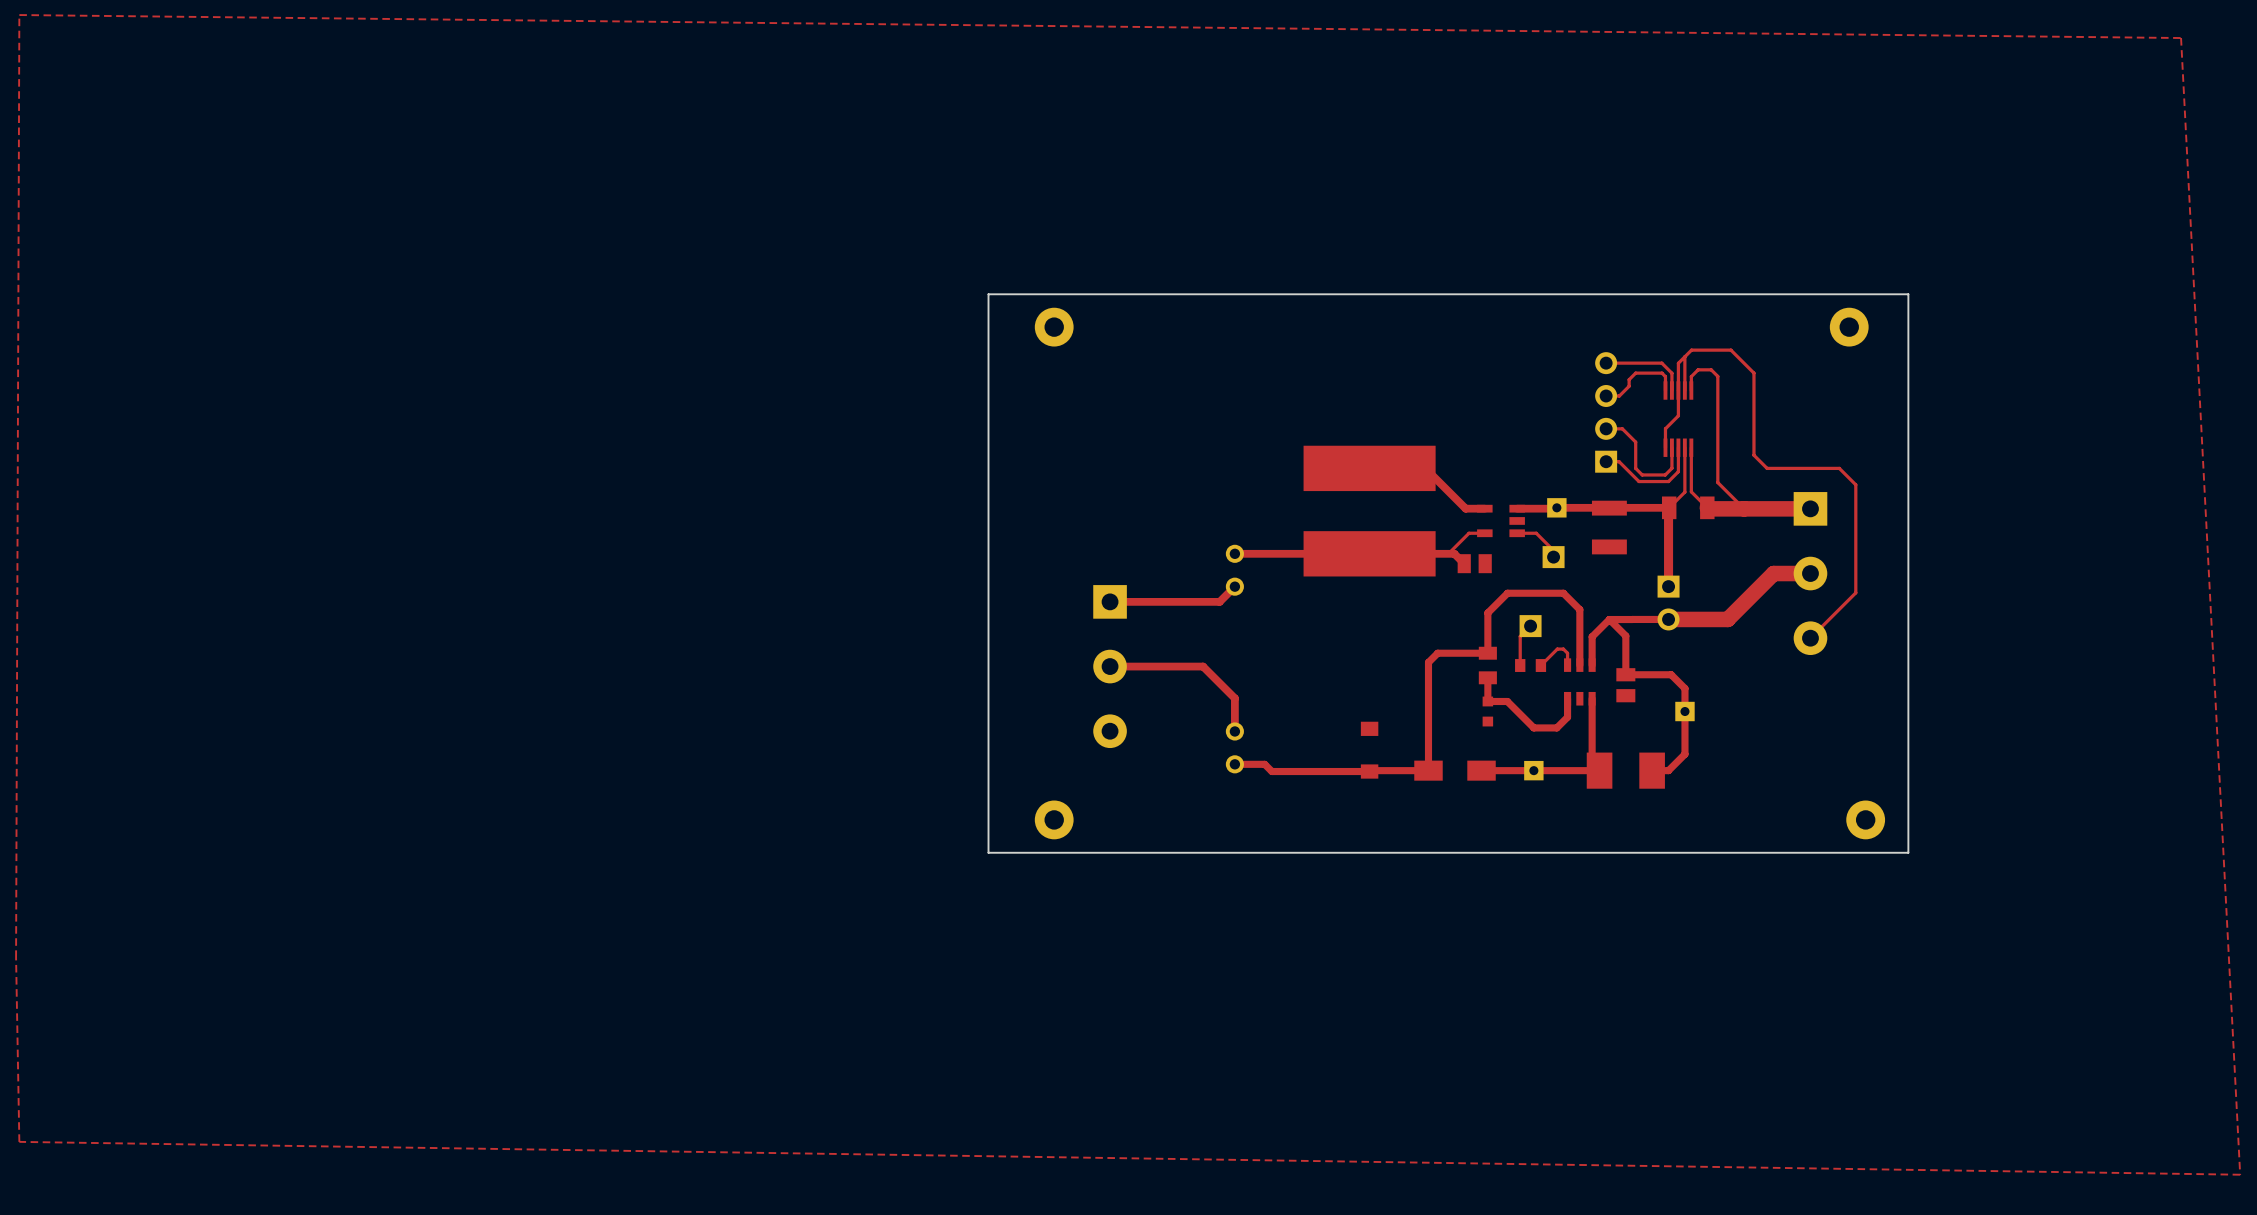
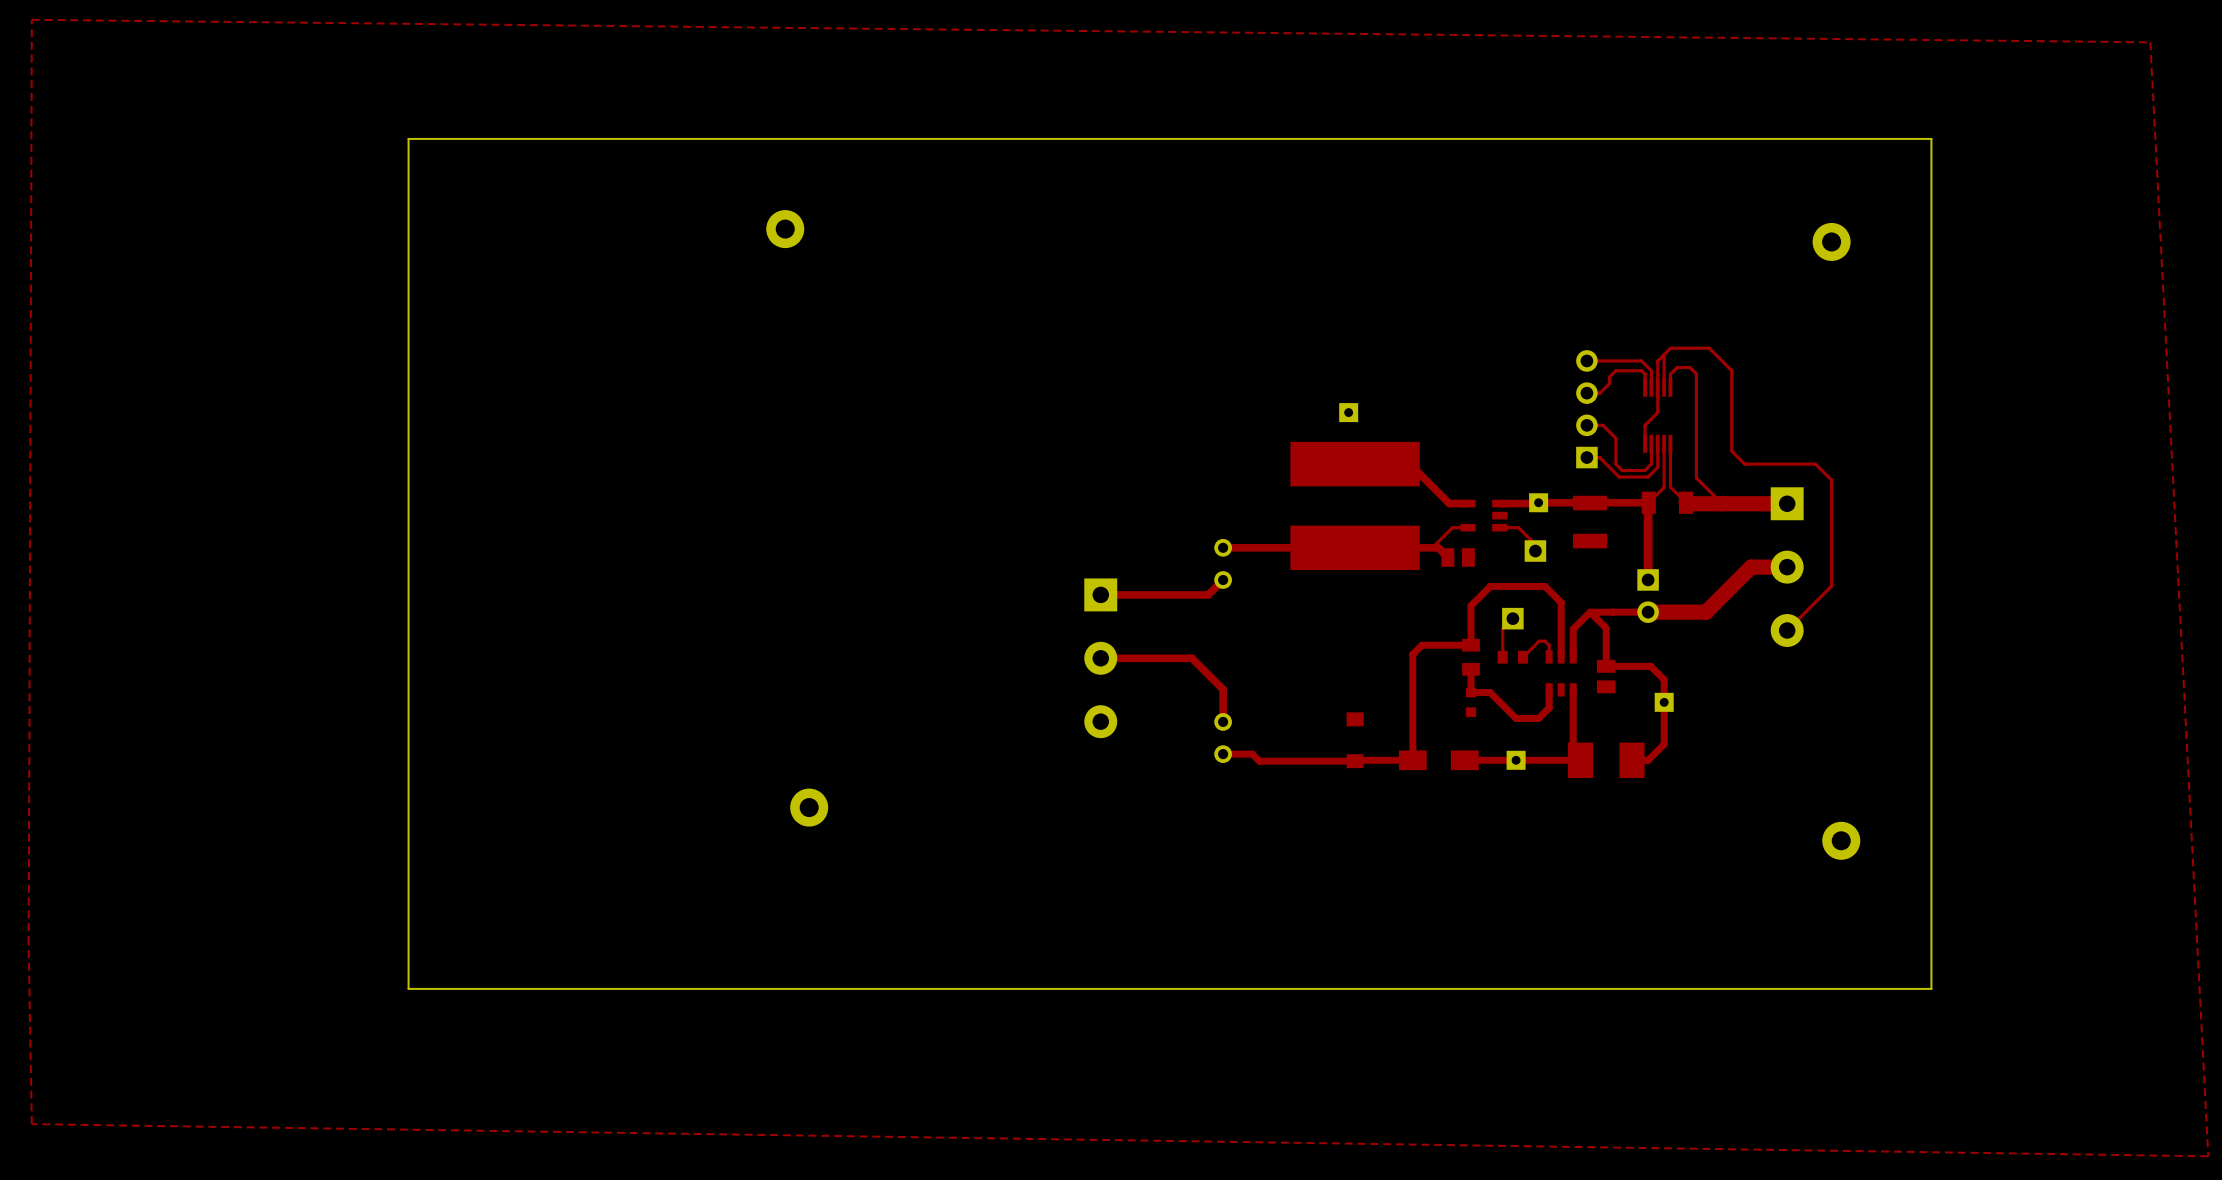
board edge: none -> (1931, 138) (408, 138) (408, 988) (1931, 988) (1931, 138)
part: none -> (785, 229)
board edge: (1908, 294) (988, 294) (988, 852) (1908, 852) (1908, 294) -> none
part: (1054, 327) -> none
part position: (1849, 327) -> (1831, 241)
part: none -> (1348, 412)
part position: (1054, 819) -> (809, 807)
part position: (1865, 819) -> (1841, 840)

